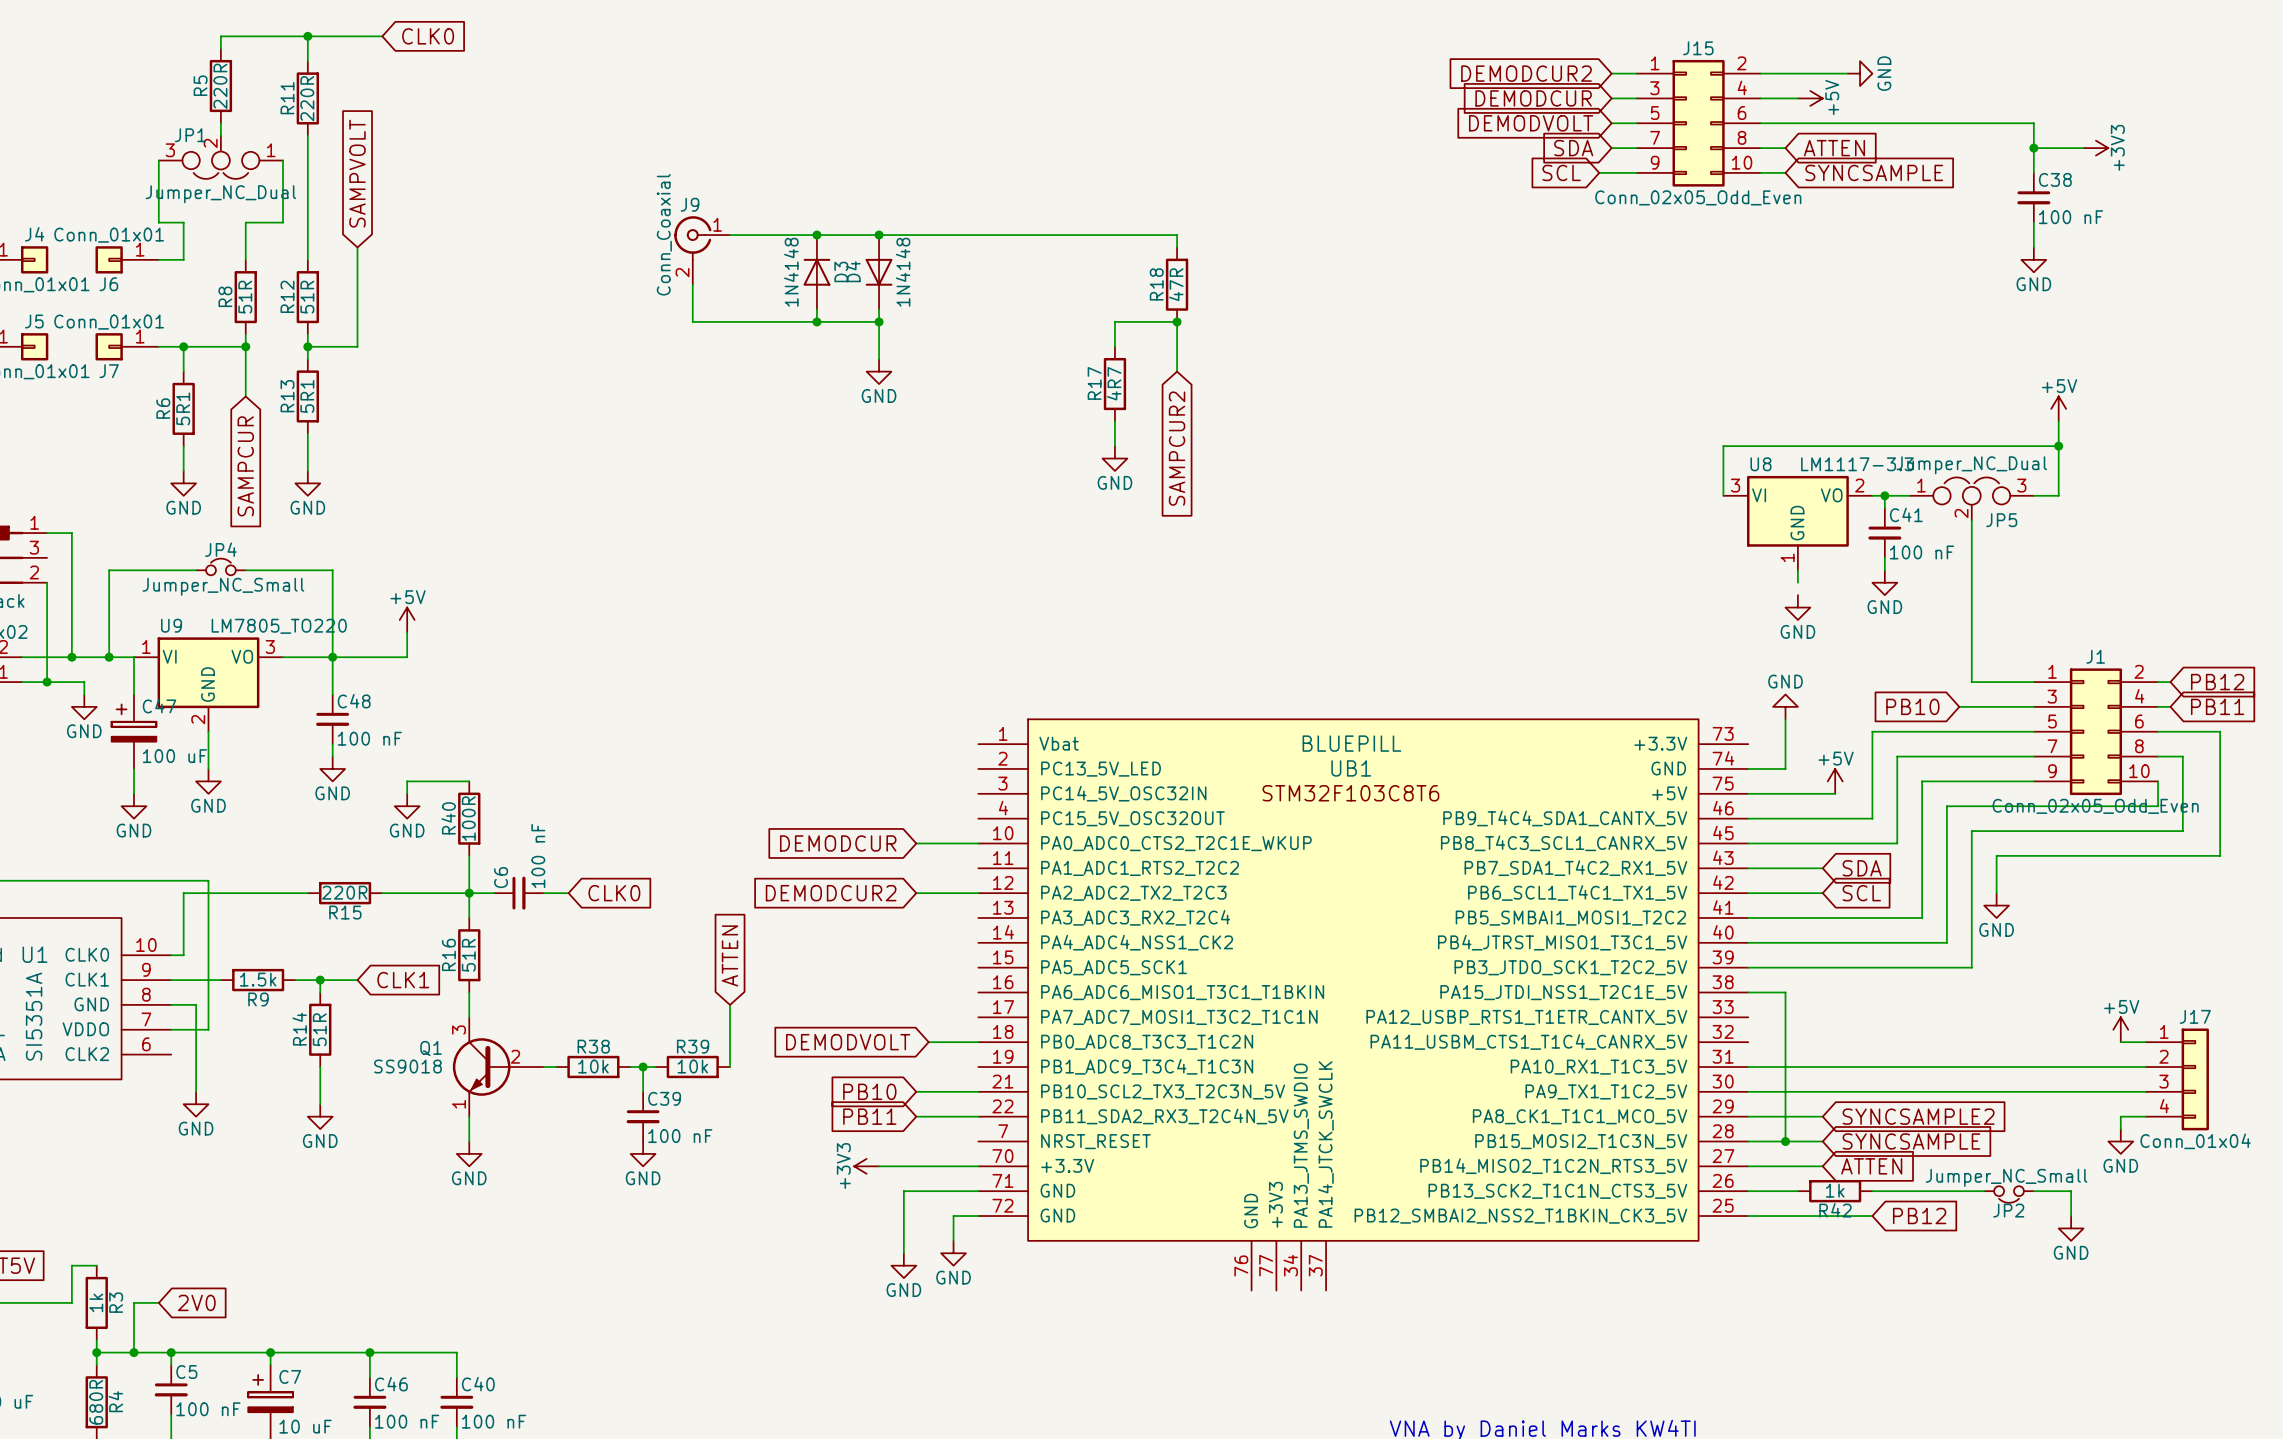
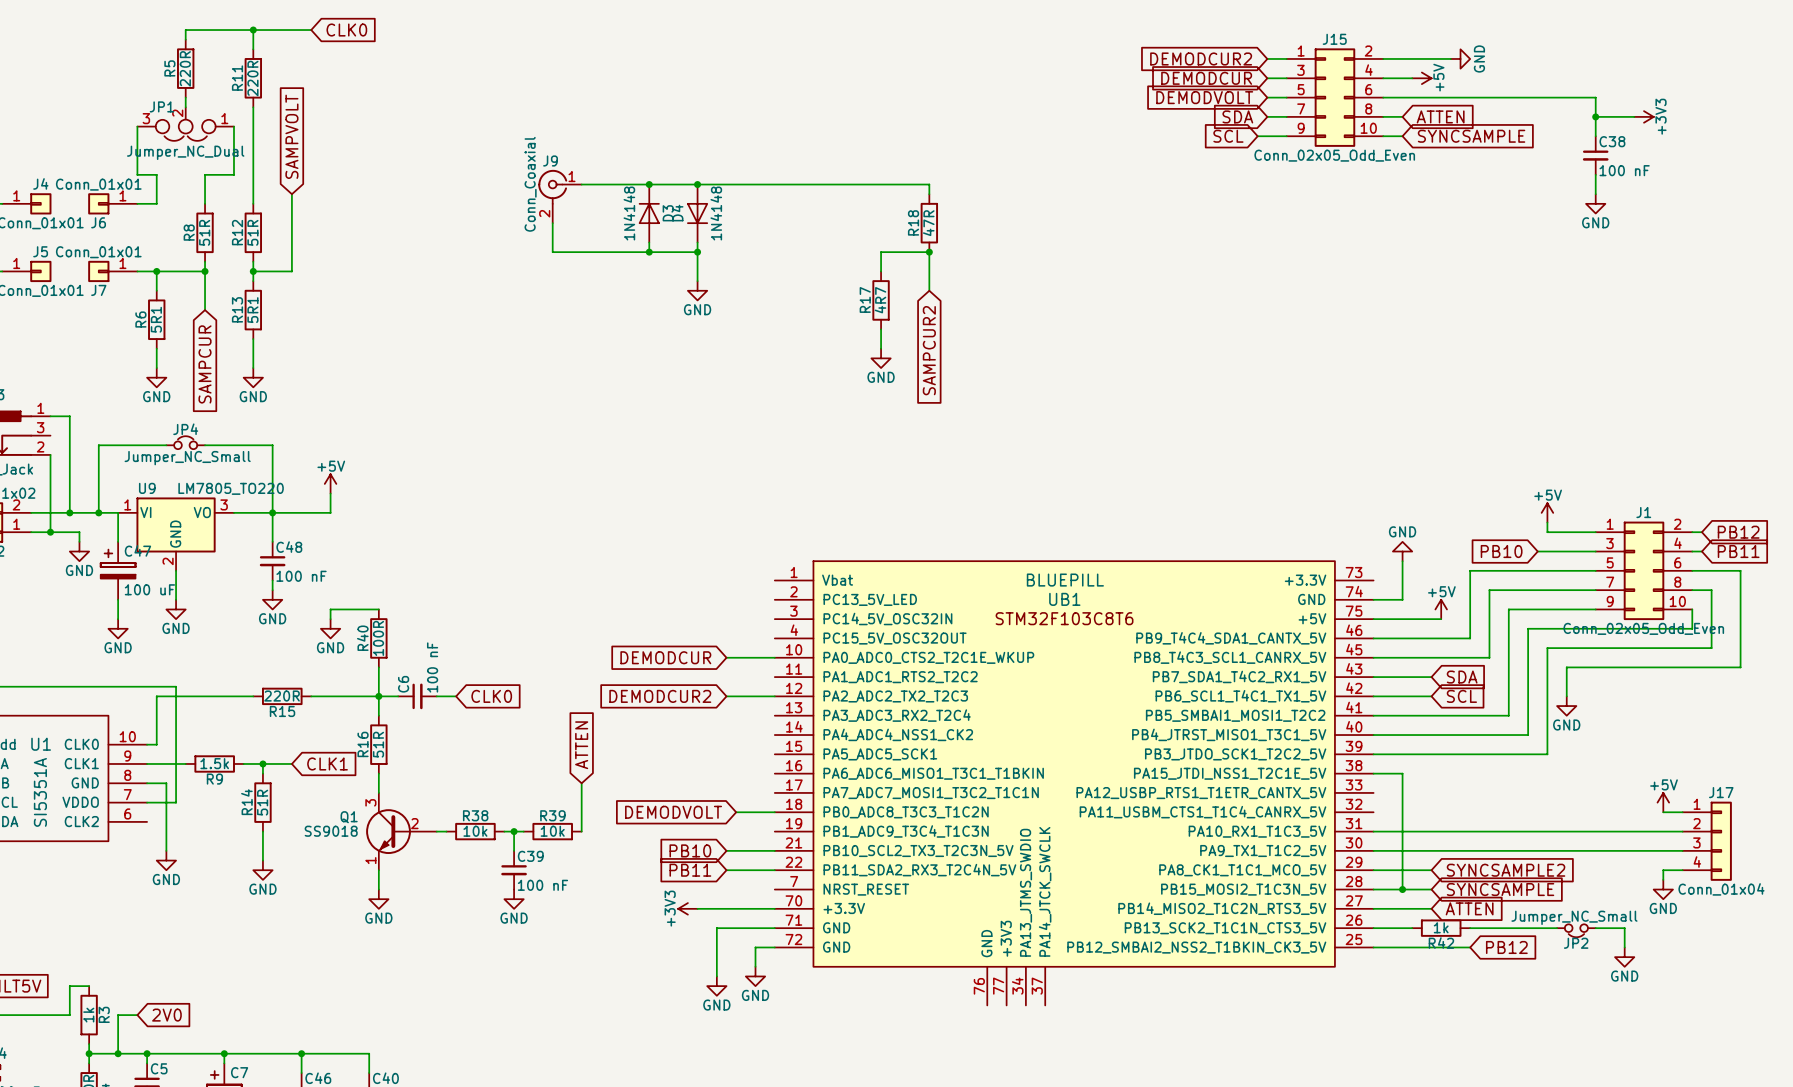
power symbol: +5V (2058, 408) -> none
wire: (2058, 421) (2058, 495) (2033, 495) -> none
wire: (2058, 446) (1723, 446) (1723, 495) -> none
junction: (2058, 446) -> none
wire: (1872, 495) (1909, 495) -> none
wire: (1884, 495) (1884, 508) -> none
junction: (1884, 495) -> none
JP5: Jumper_NC_Dual (1971, 499) -> none
wire: (1971, 520) (1971, 669) -> none
U8: LM1117-3.3 (1797, 523) -> none
C41: 100 nF (1884, 533) -> none
wire: (1884, 557) (1884, 570) -> none
wire: (1797, 570) (1797, 582) -> none
power symbol: GND (1884, 582) -> none
power symbol: GND (1797, 607) -> none
power symbol: none -> +5V (1547, 512)

